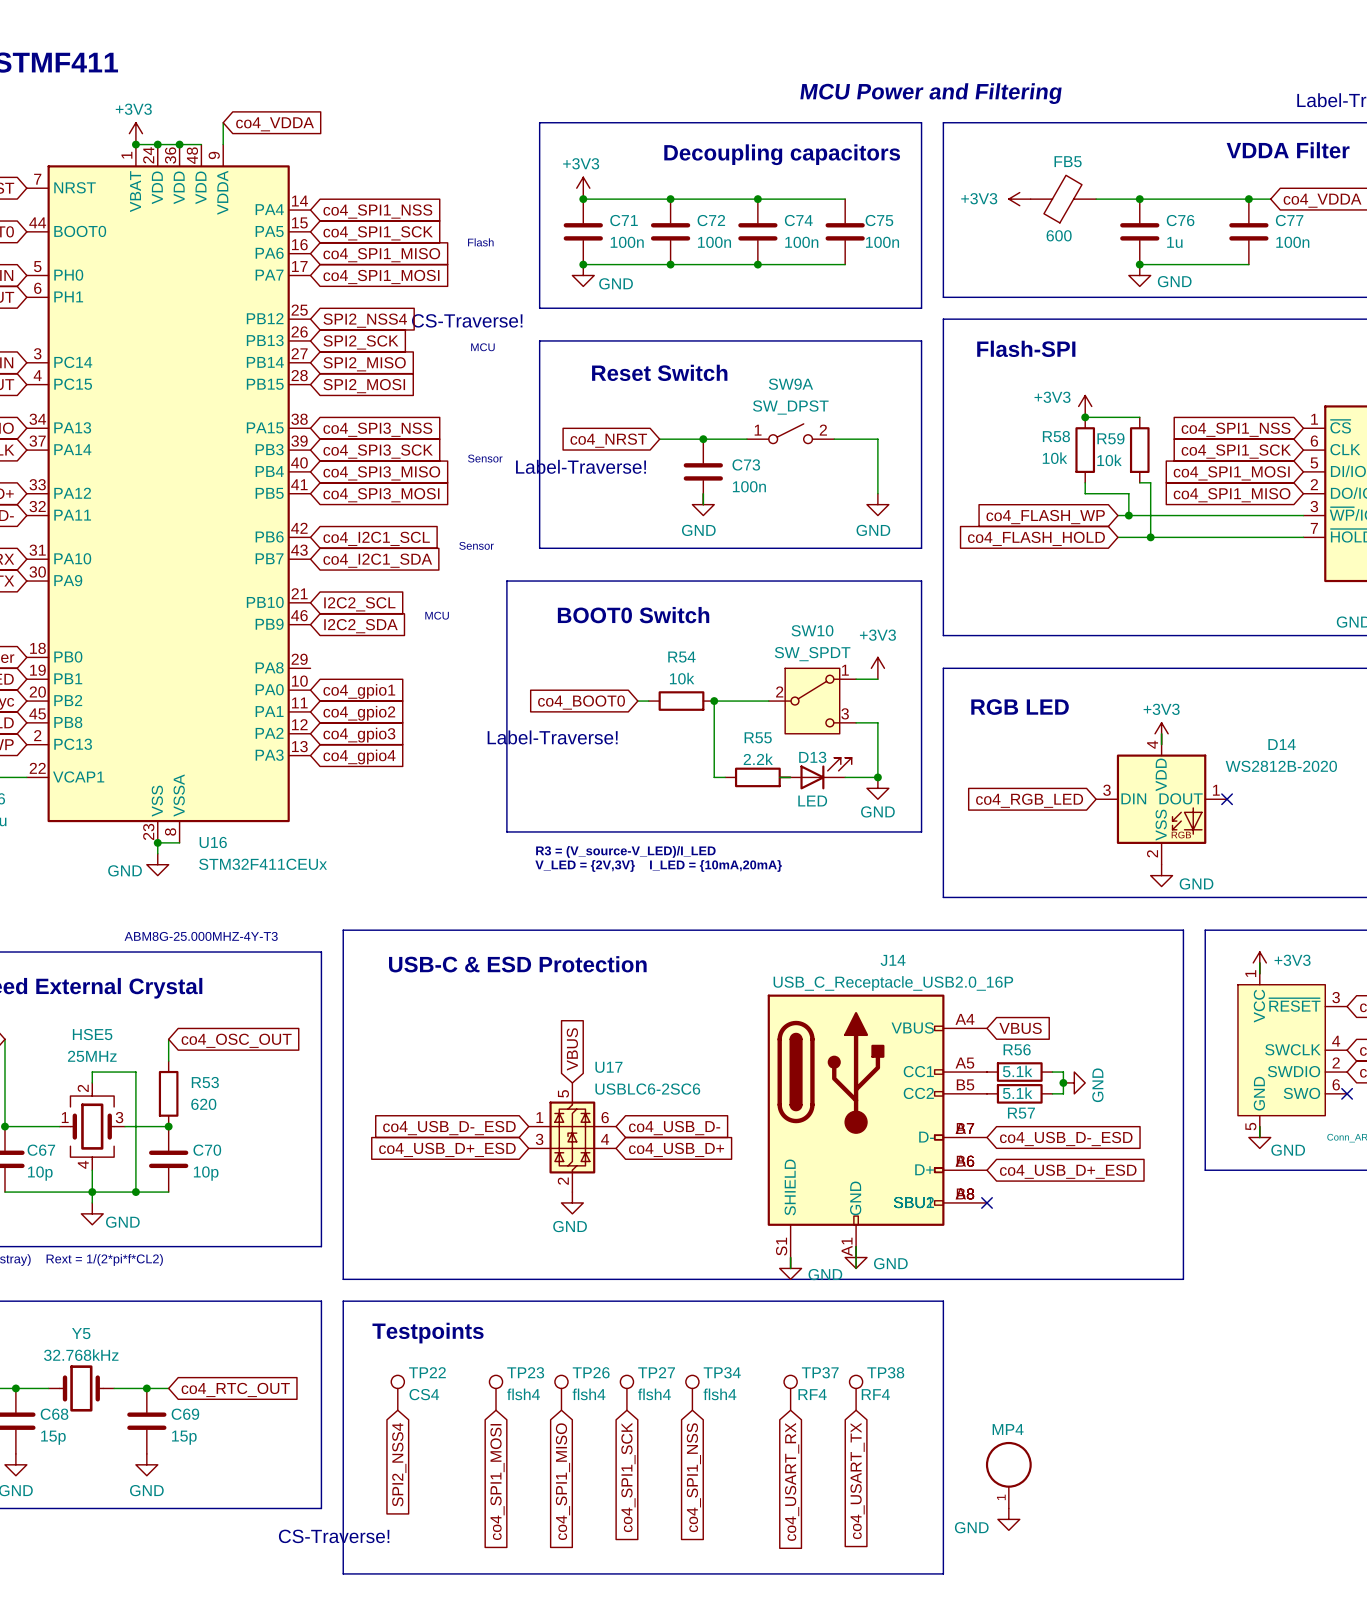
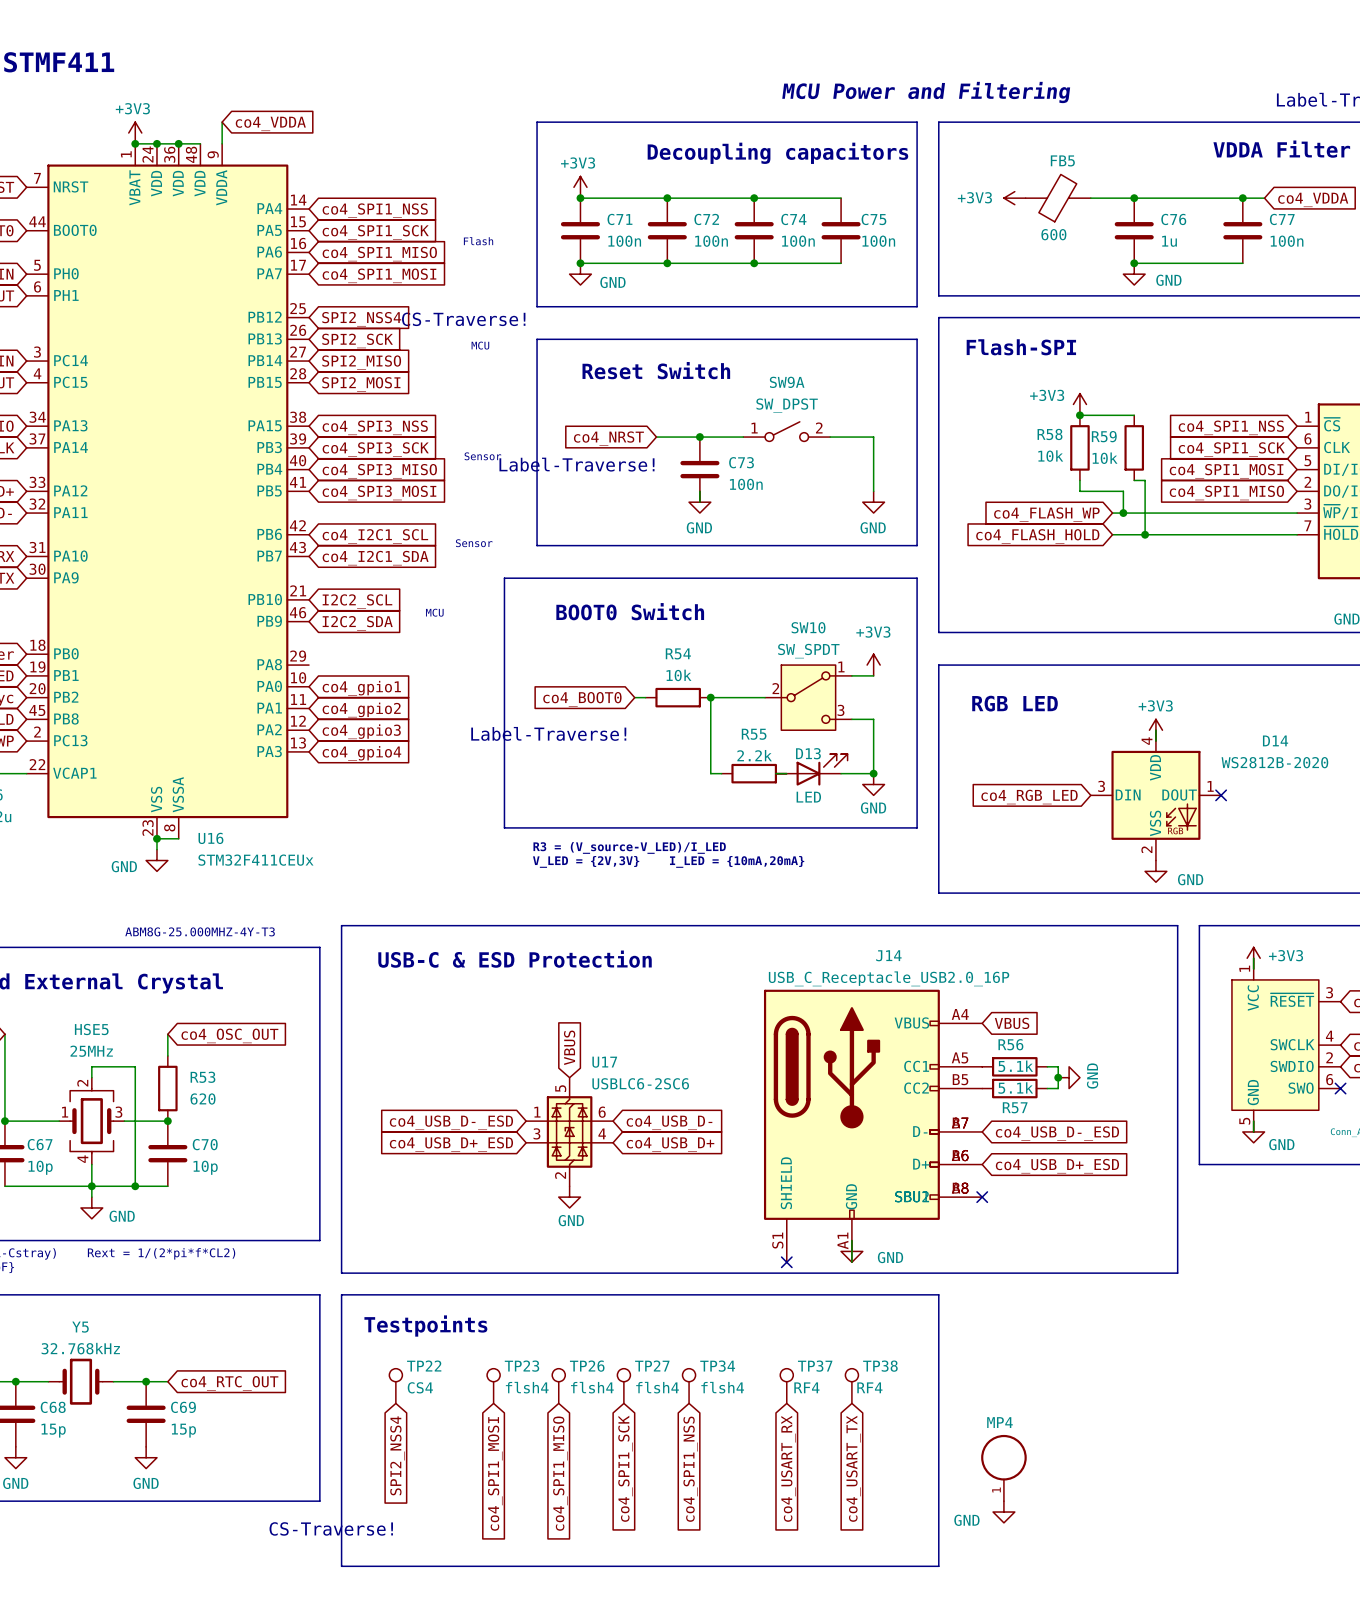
power symbol: GND (790, 1268) -> none
no-connect mark: none -> (786, 1262)

